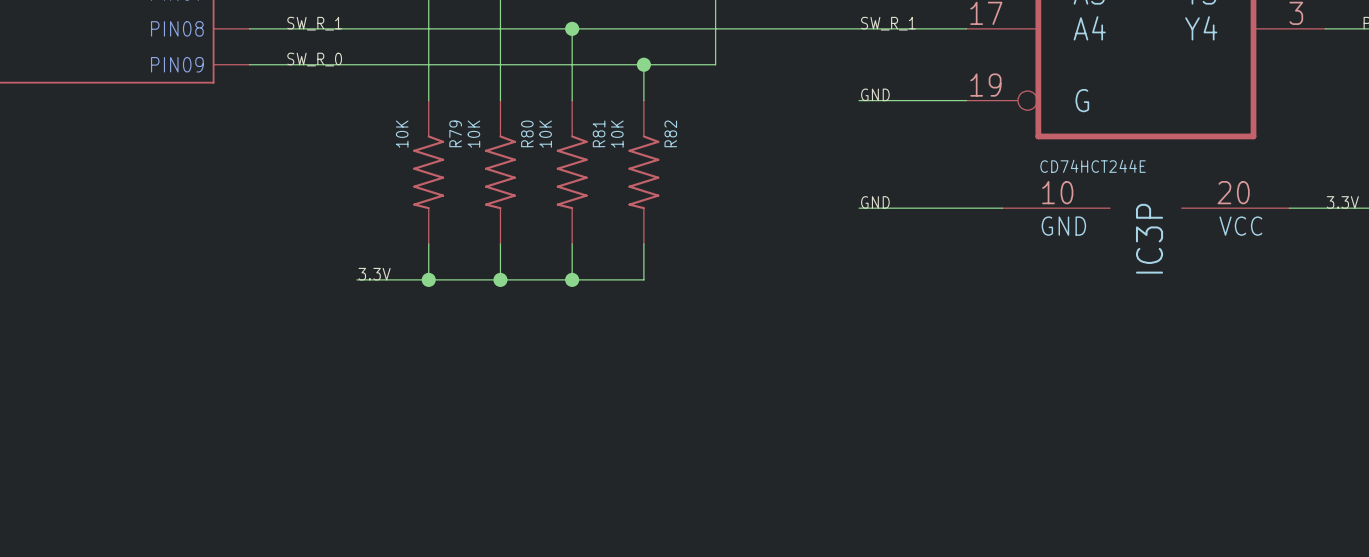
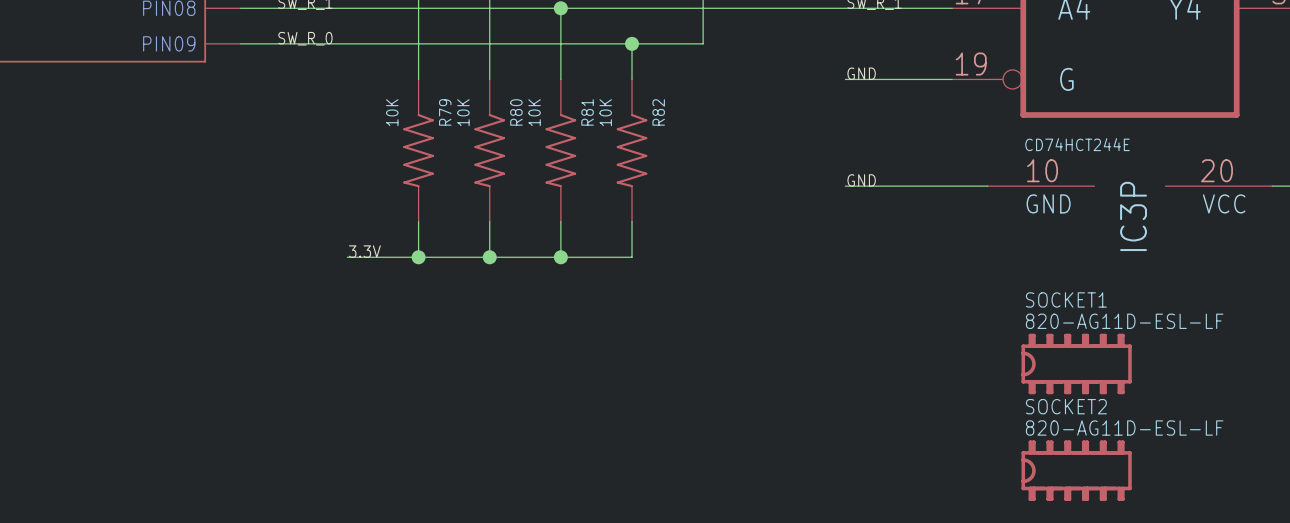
SOCKET1: none -> 820-AG11D-ESL-LF (1076, 363)
SOCKET2: none -> 820-AG11D-ESL-LF (1076, 470)

